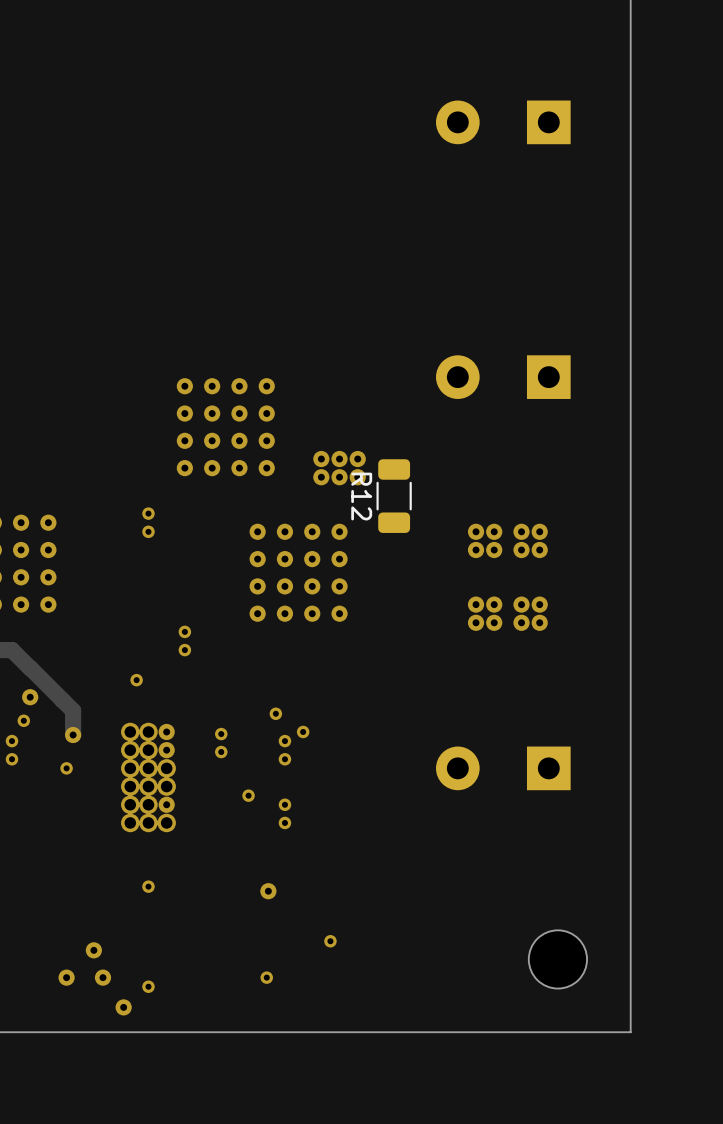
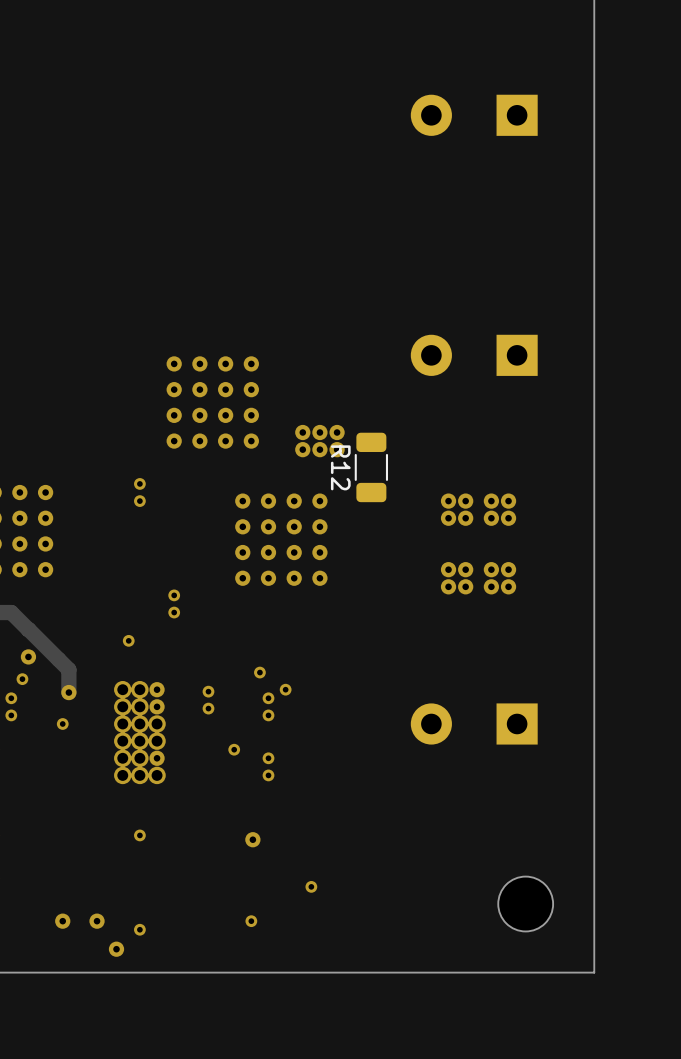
via: (93, 950) -> none

